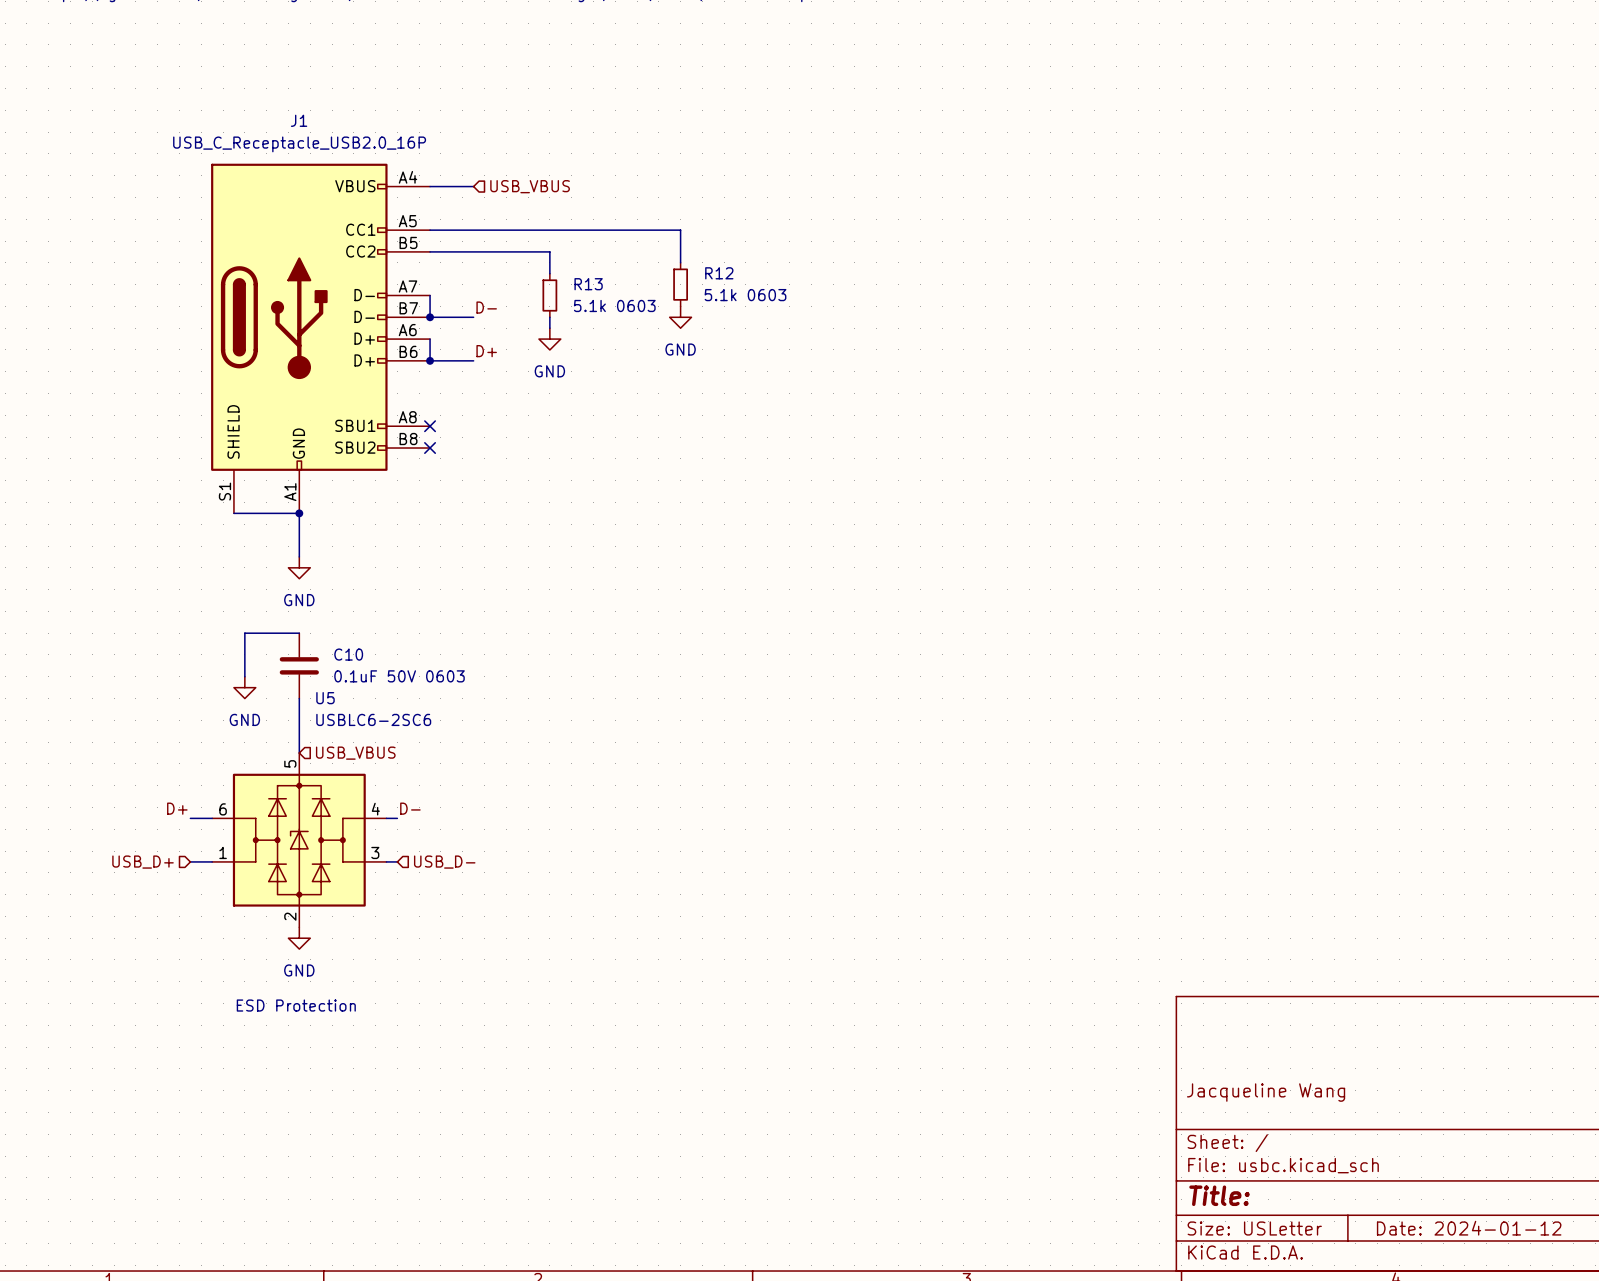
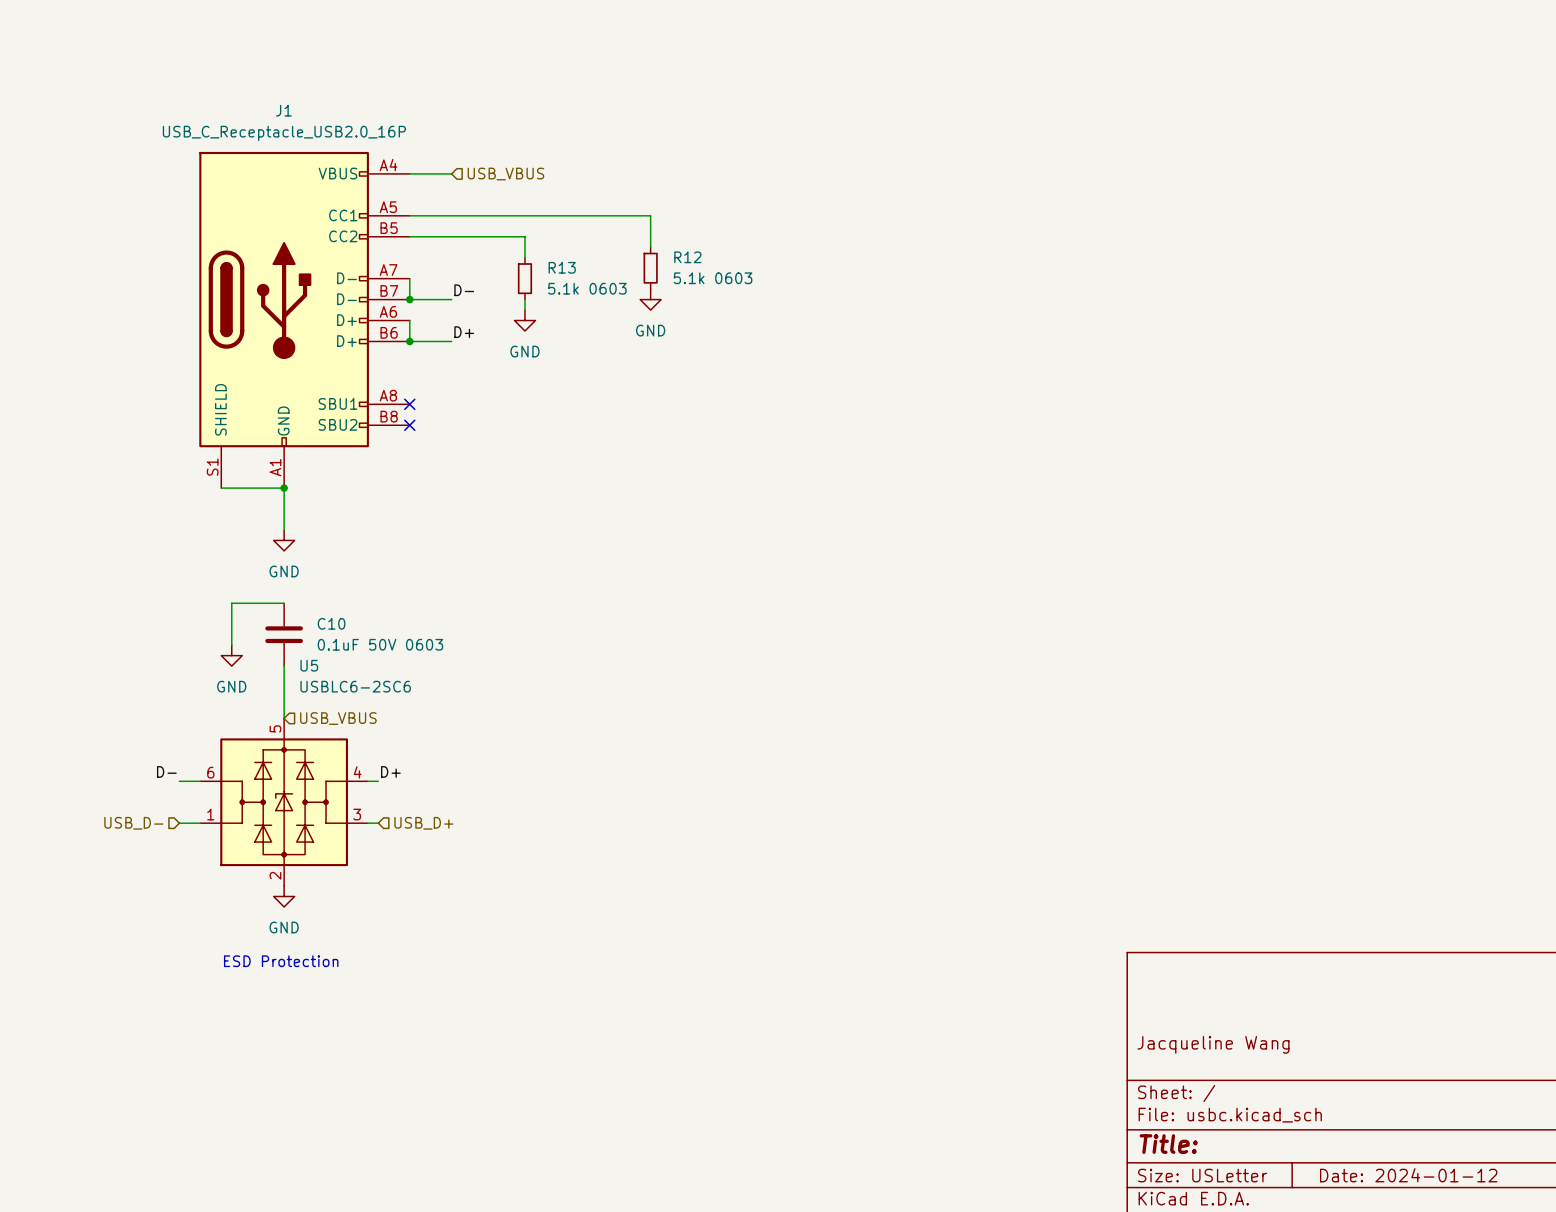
label: D+ (177, 808) -> D- (166, 771)
label: D- (410, 808) -> D+ (390, 771)
hierarchical label: USB_D+ (143, 862) -> USB_D- (133, 823)
hierarchical label: USB_D- (444, 862) -> USB_D+ (423, 823)

